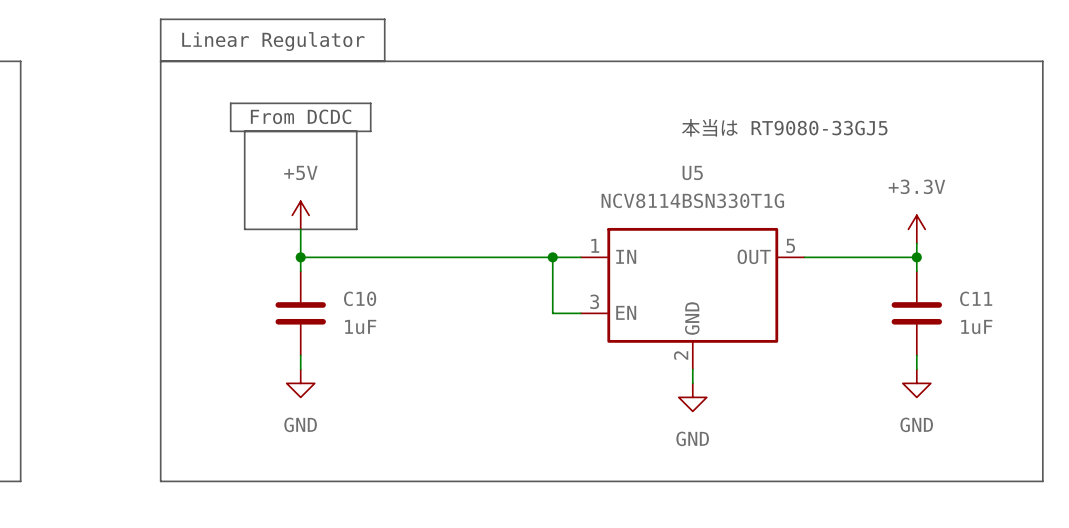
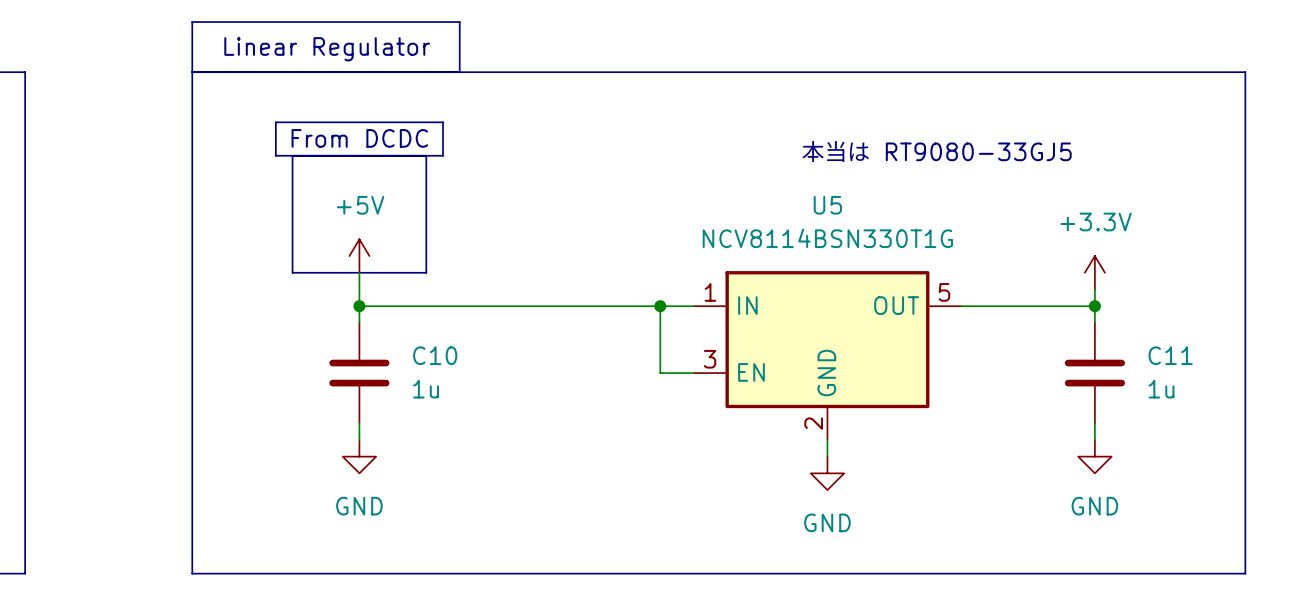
C10 value: 1uF (360, 326) -> 1u (426, 389)
C11 value: 1uF (976, 326) -> 1u (1161, 389)

